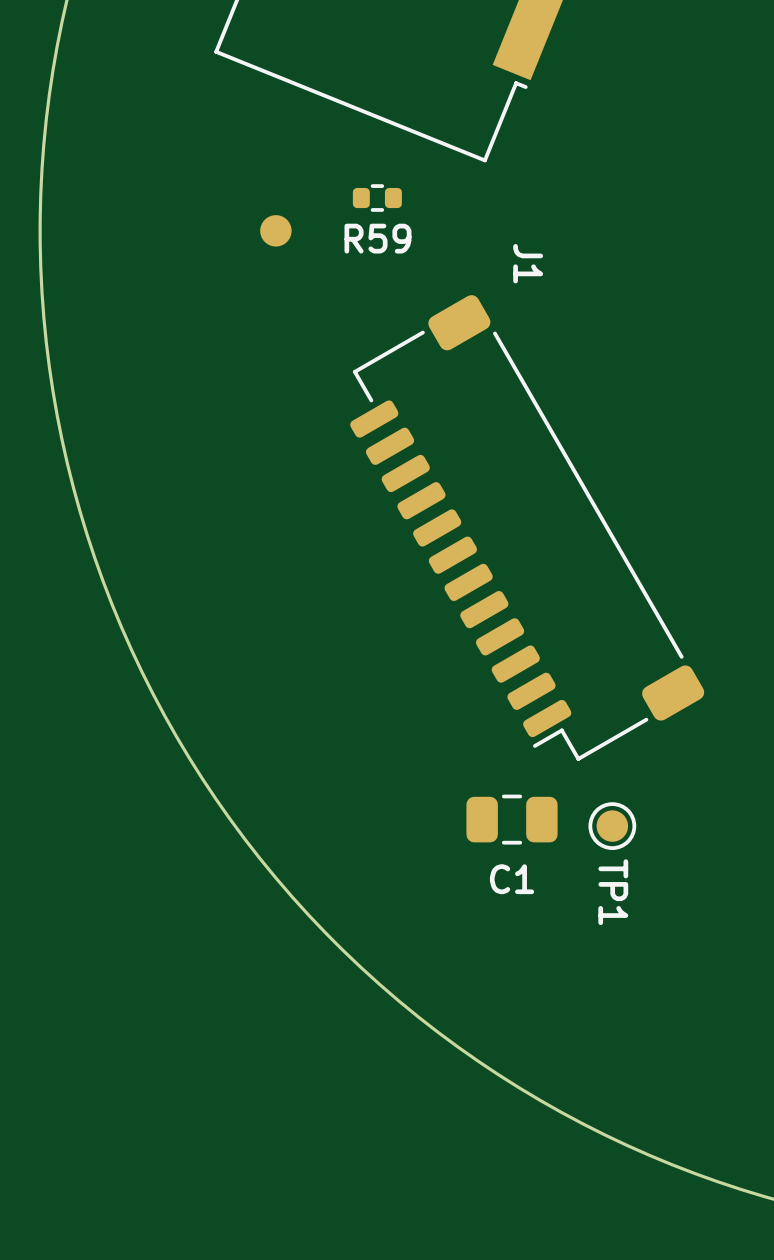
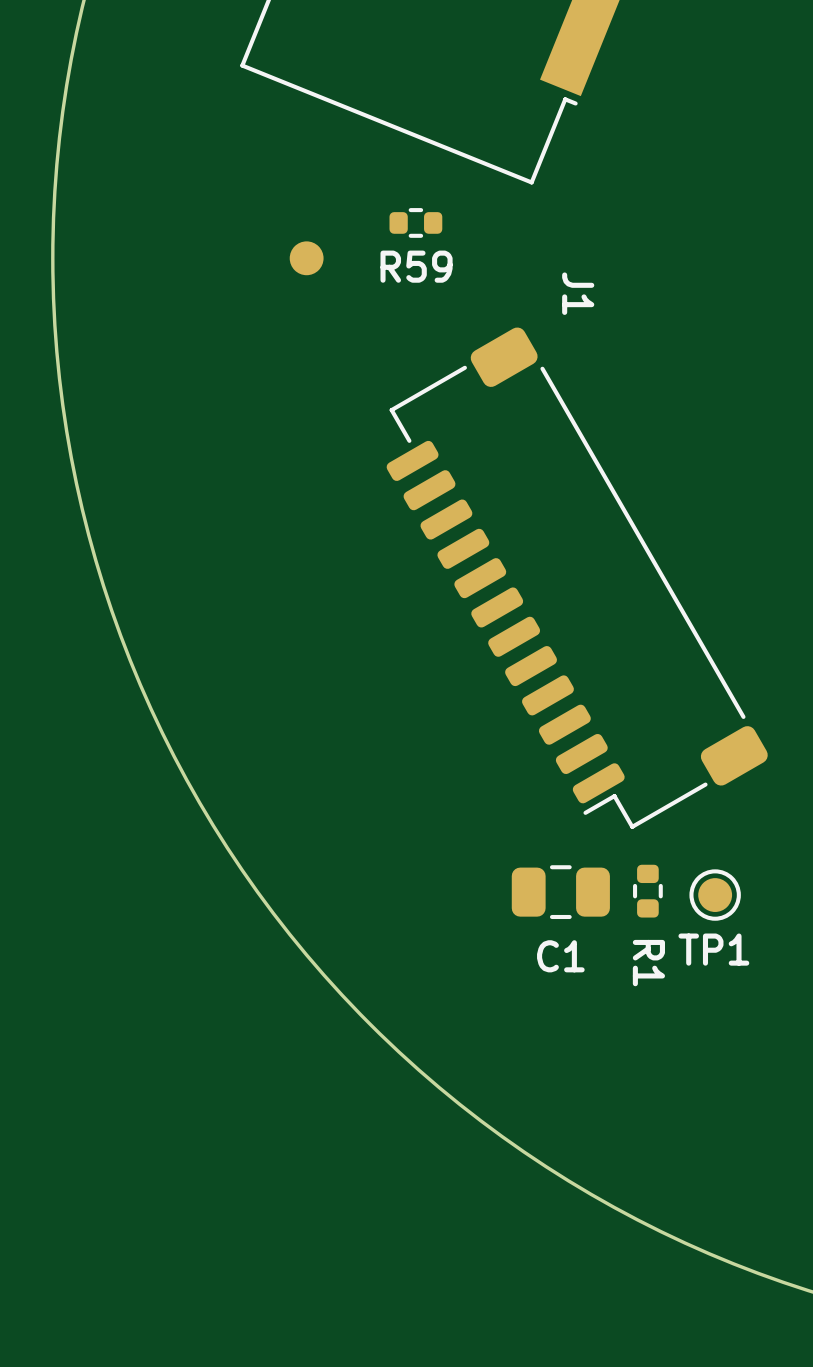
R1: none -> (647, 891)
TP1 position: (612, 826) -> (715, 895)
TP1 name rotation: 0° (613, 892) -> 90° counterclockwise (713, 949)

